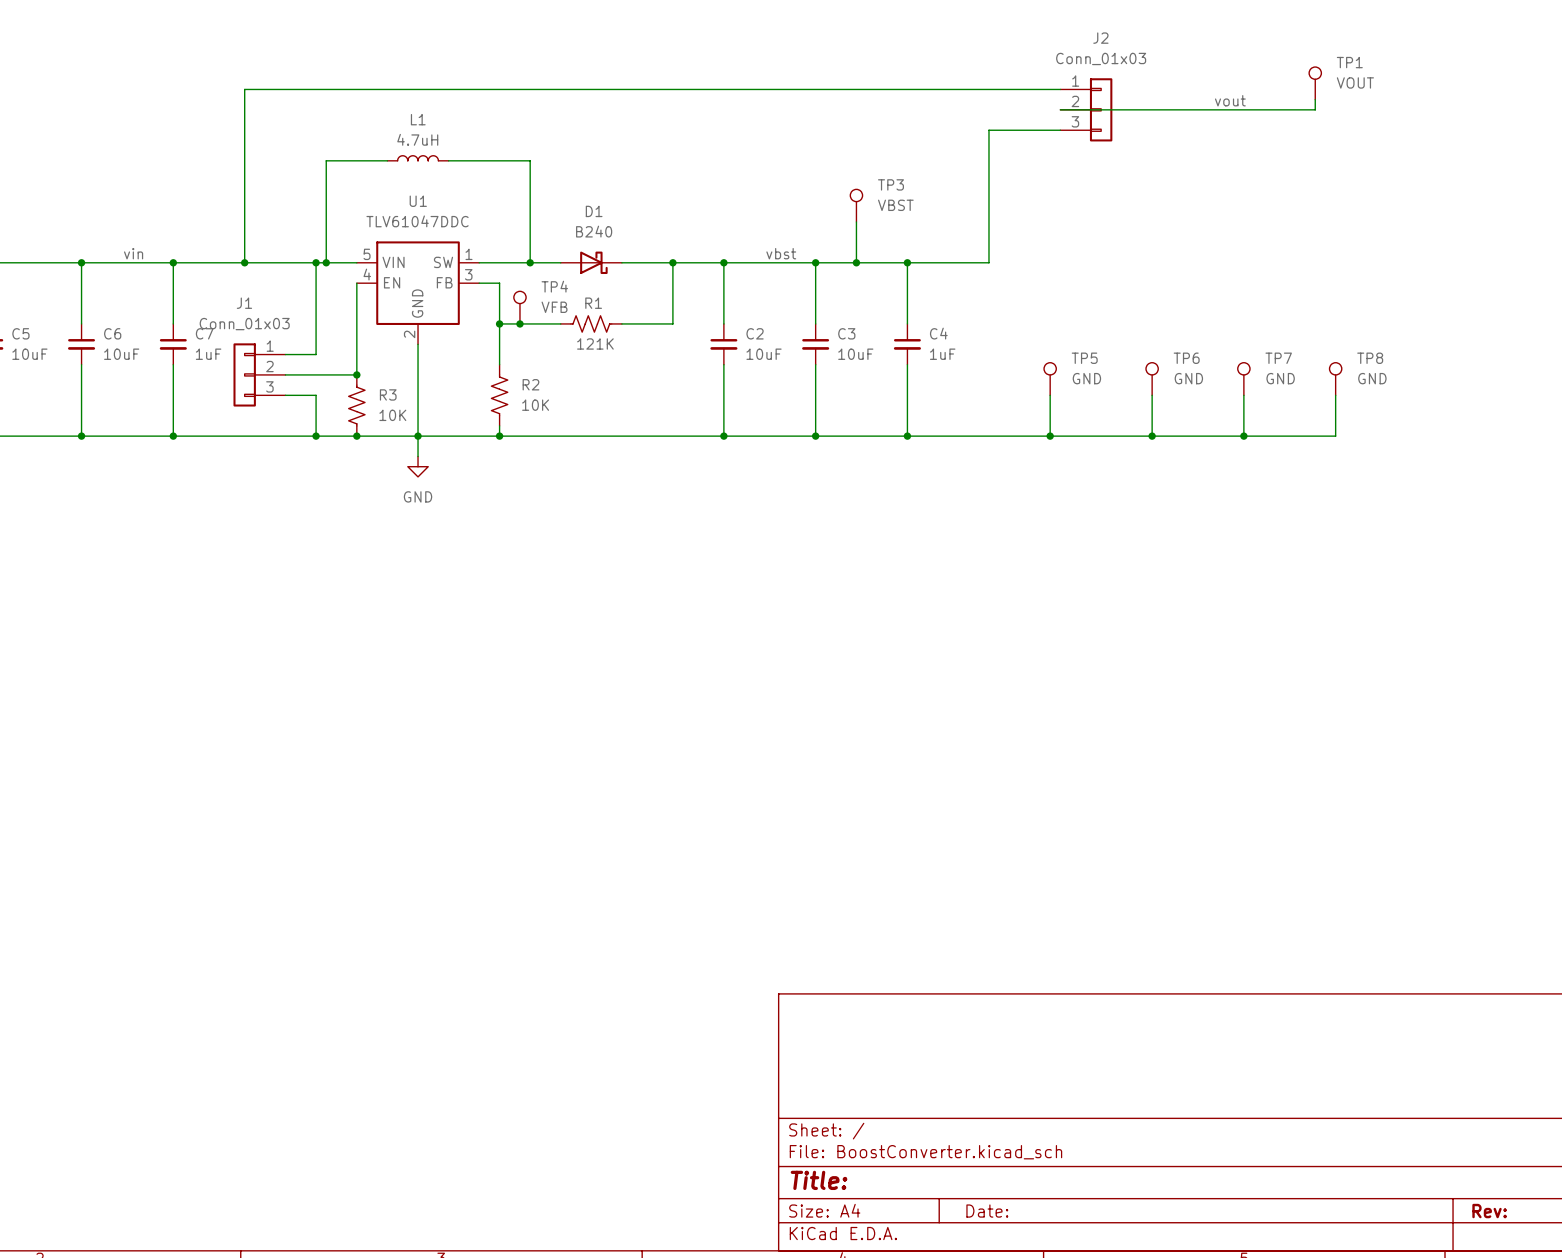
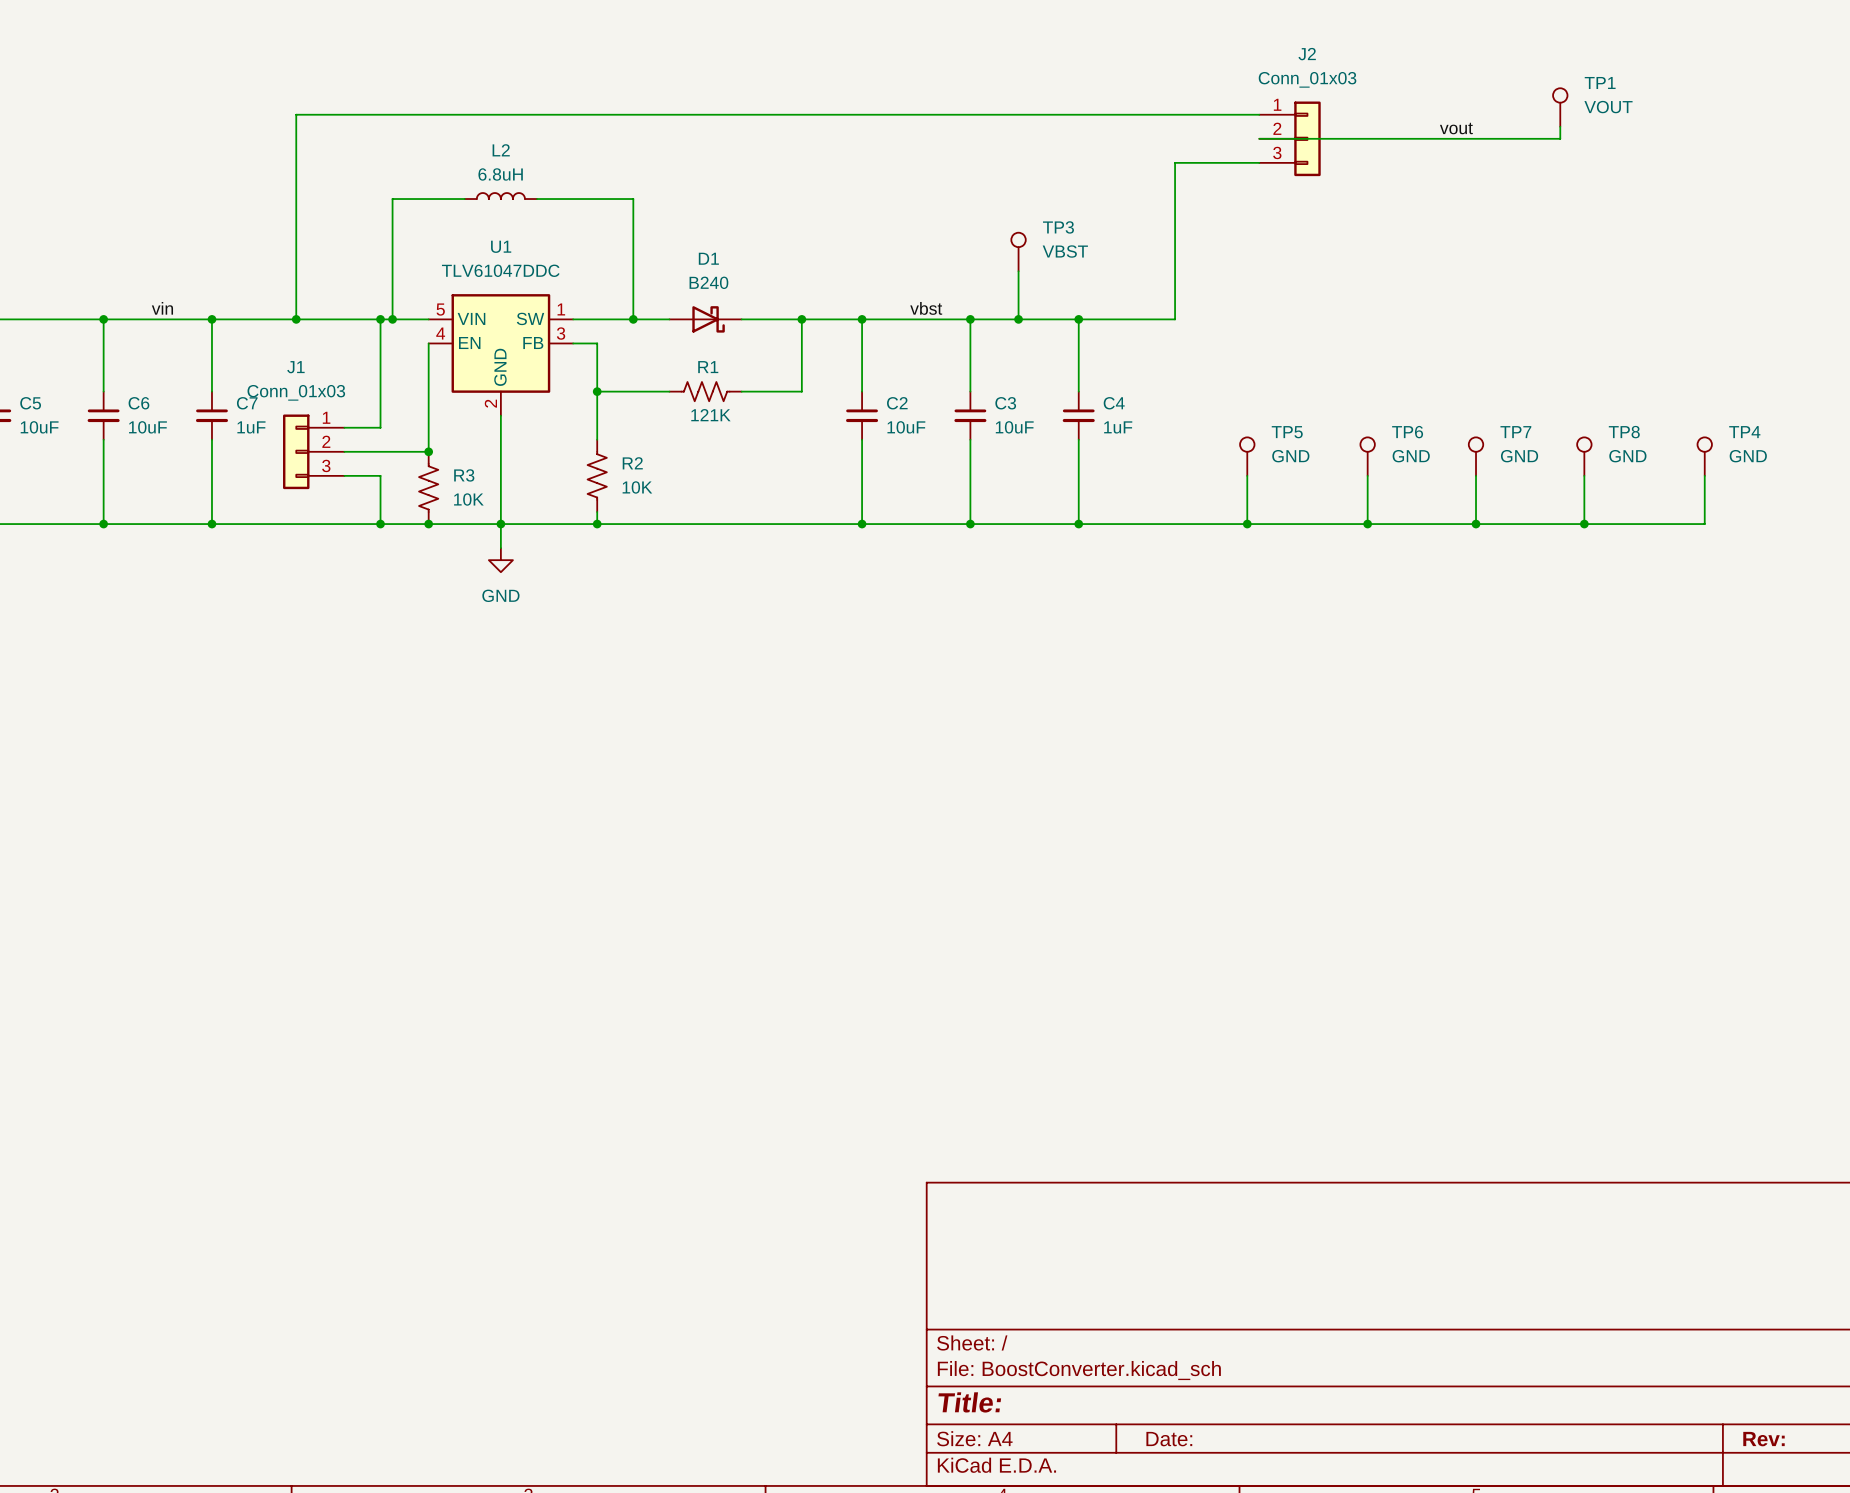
L1 name: L1 (418, 119) -> L2 (501, 150)
L1 value: 4.7uH (417, 139) -> 6.8uH (500, 174)
TP4 position: (519, 307) -> (1704, 456)
TP4 value: VFB (554, 307) -> GND (1748, 456)
junction: (519, 323) -> none
wire: none -> (1704, 475) (1704, 524) (1584, 524)
junction: none -> (1584, 524)

